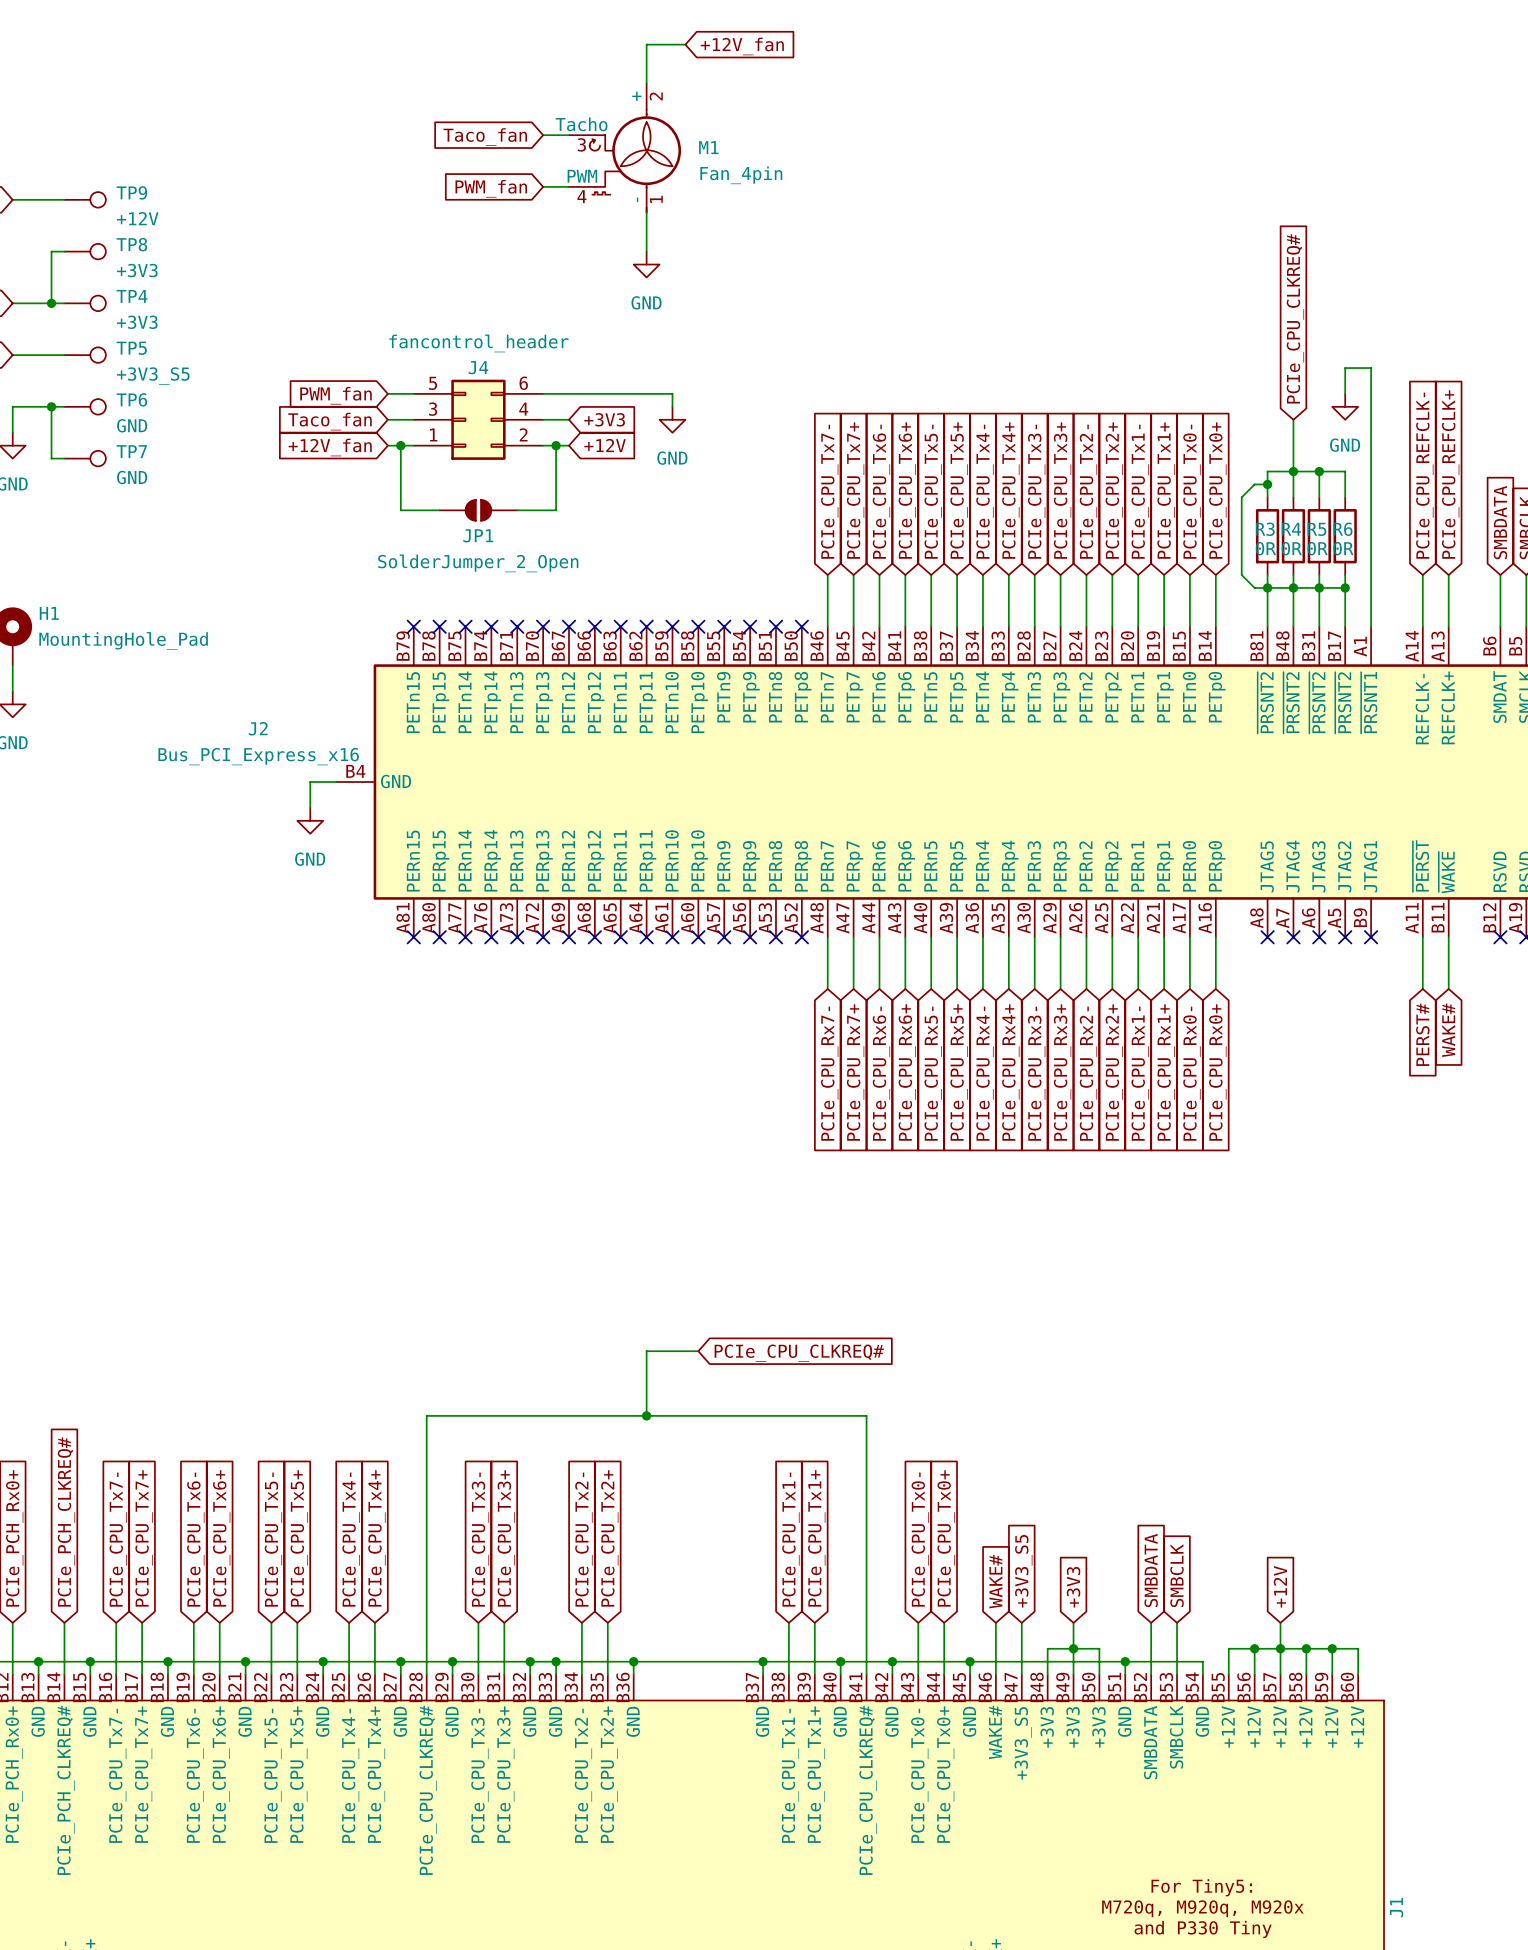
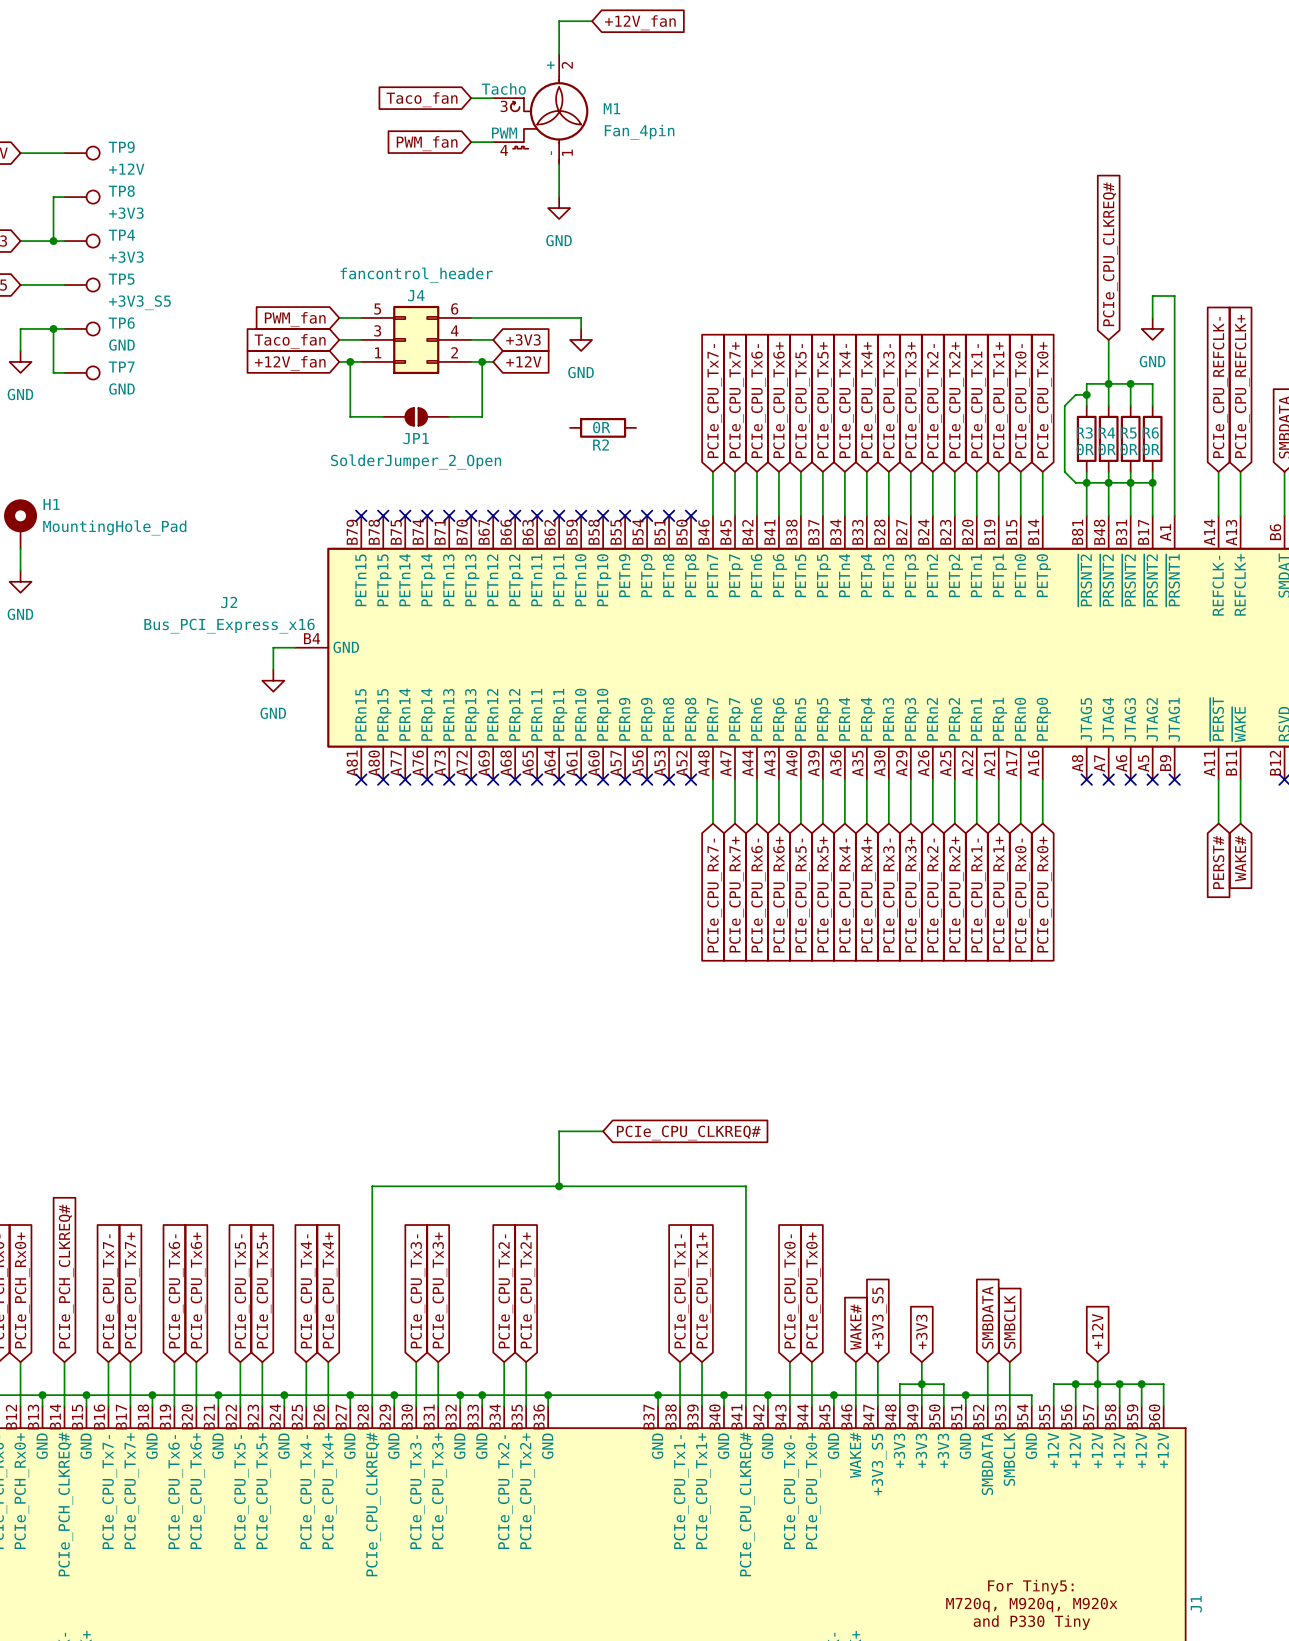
R2: none -> 0R (603, 427)

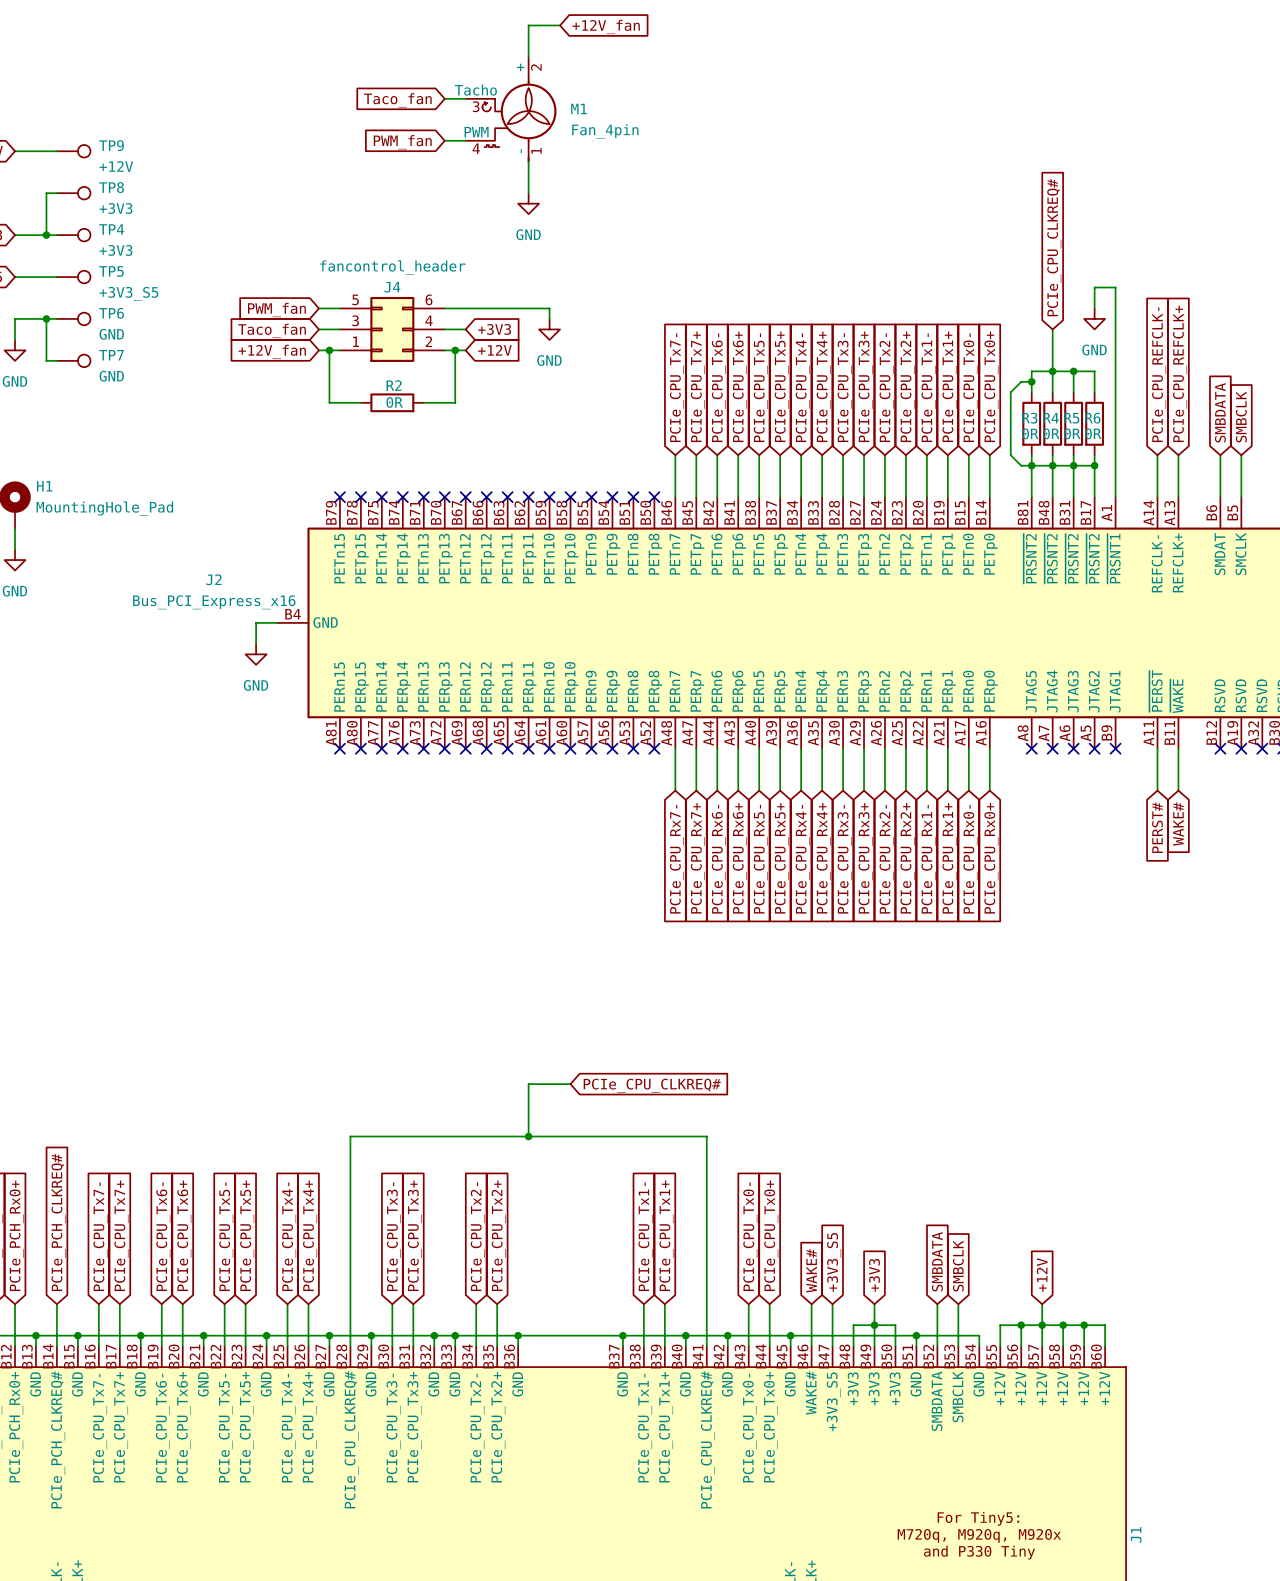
JP1: SolderJumper_2_Open (416, 416) -> none
R2 value position: 0R (601, 427) -> 0R (394, 402)
R2 position: (603, 427) -> (392, 402)
R2 name position: R2 (601, 444) -> R2 (394, 385)

